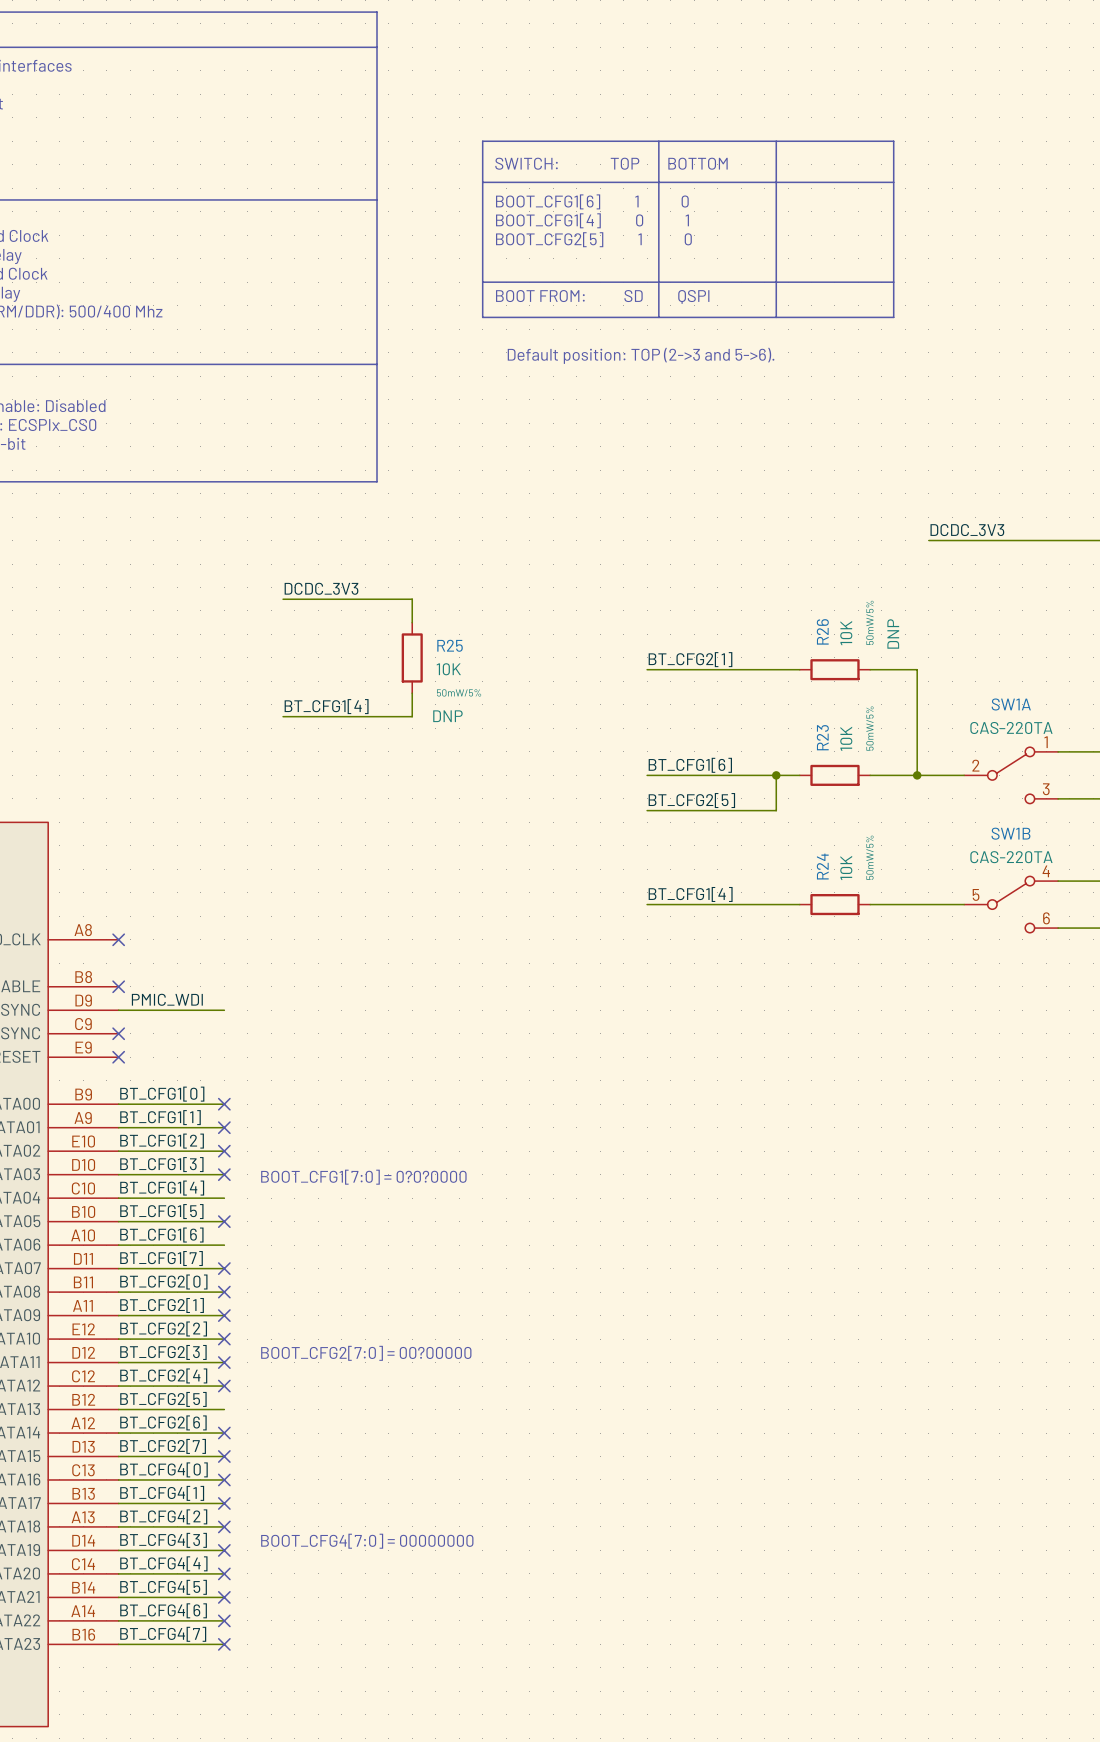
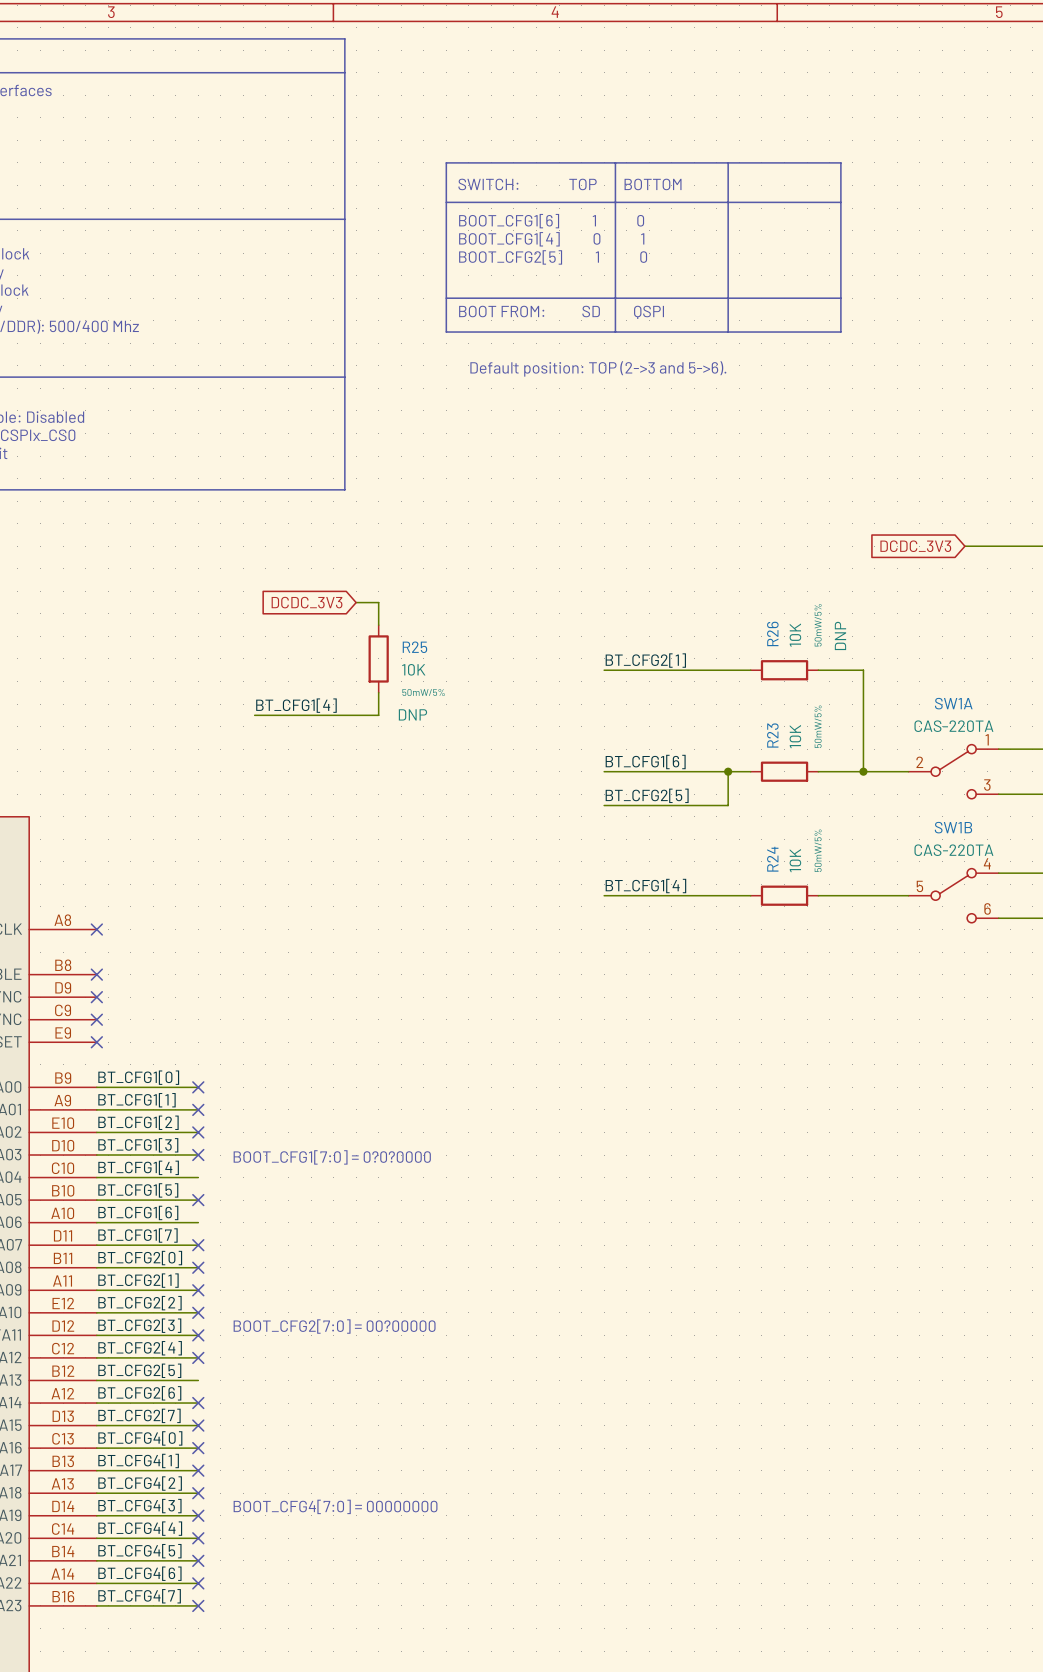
label: DCDC_3V3 (967, 530) -> none
wire: (928, 540) (1022, 540) -> none
global label: none -> DCDC_3V3 (915, 546)
label: DCDC_3V3 (321, 588) -> none
wire: (283, 599) (388, 599) -> none
global label: none -> DCDC_3V3 (307, 602)
label: PMIC_WDI (167, 999) -> none
wire: (118, 1010) (224, 1010) -> none
no-connect mark: none -> (96, 997)

